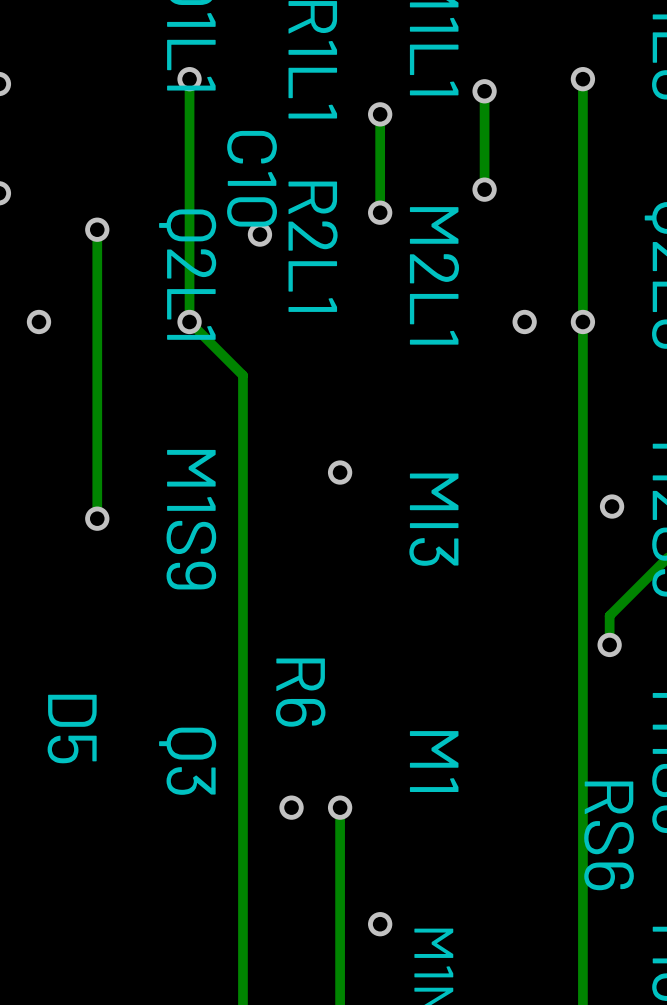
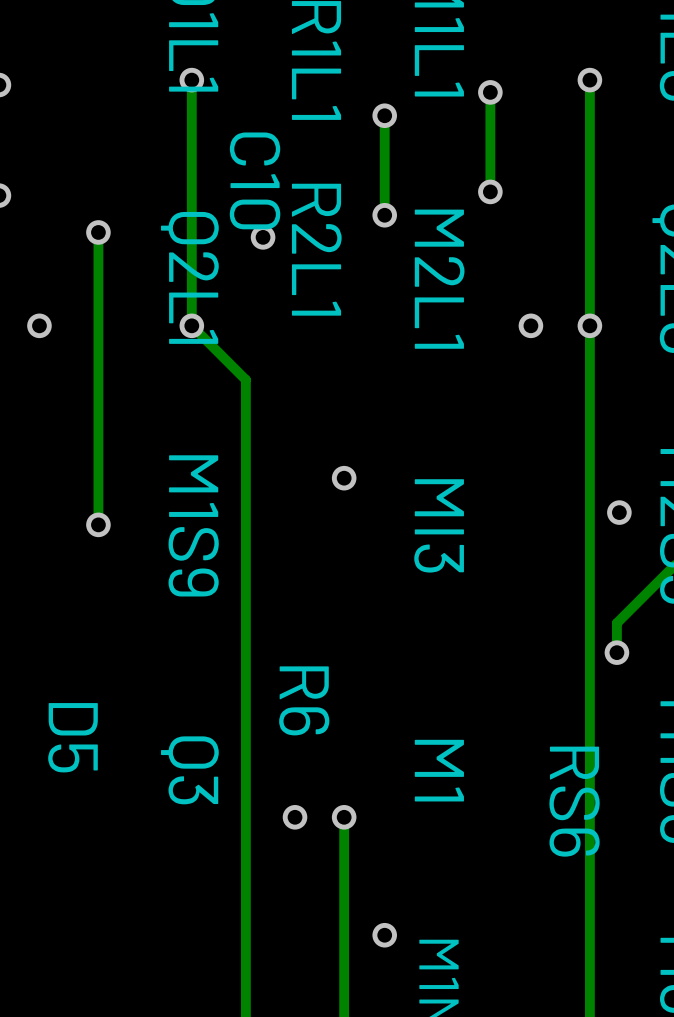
RS6 position: (609, 835) -> (574, 801)

